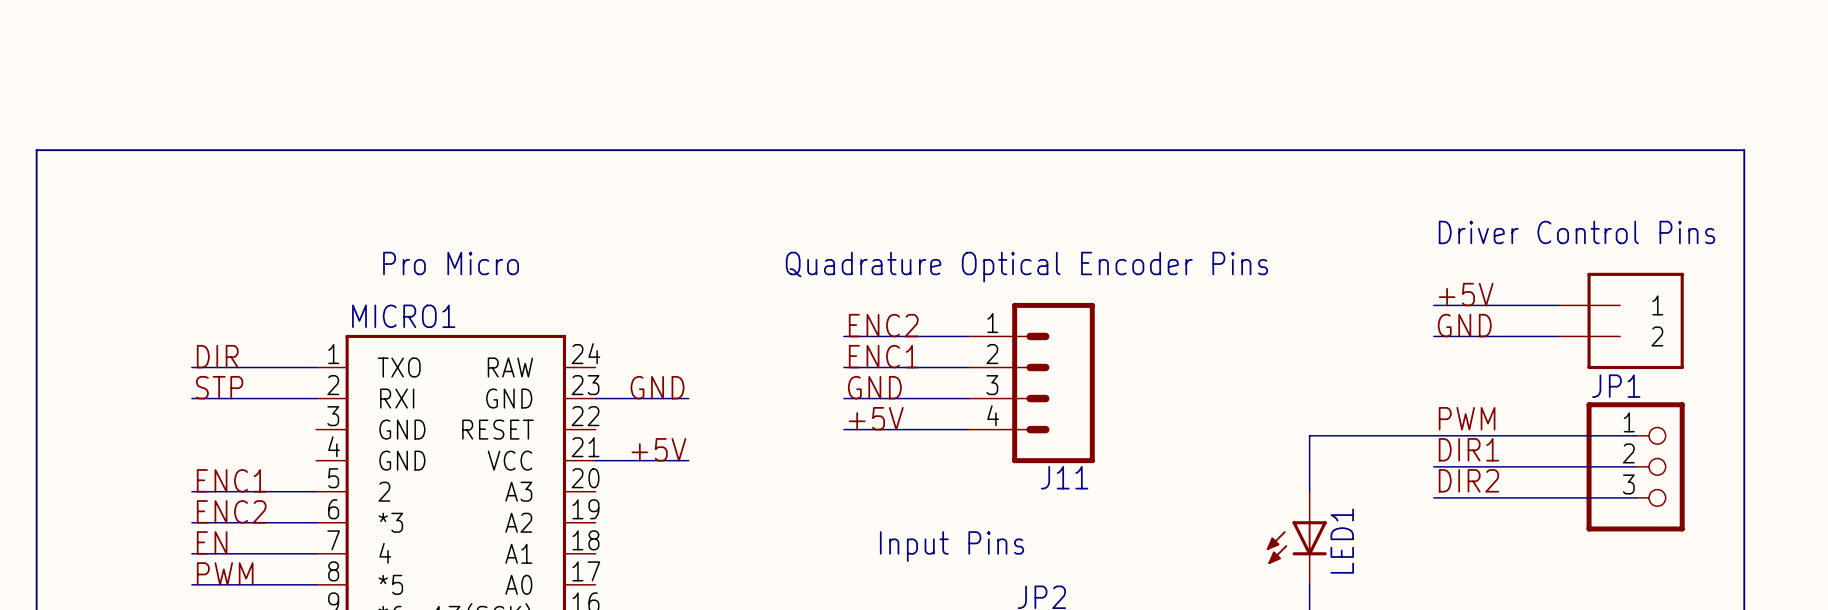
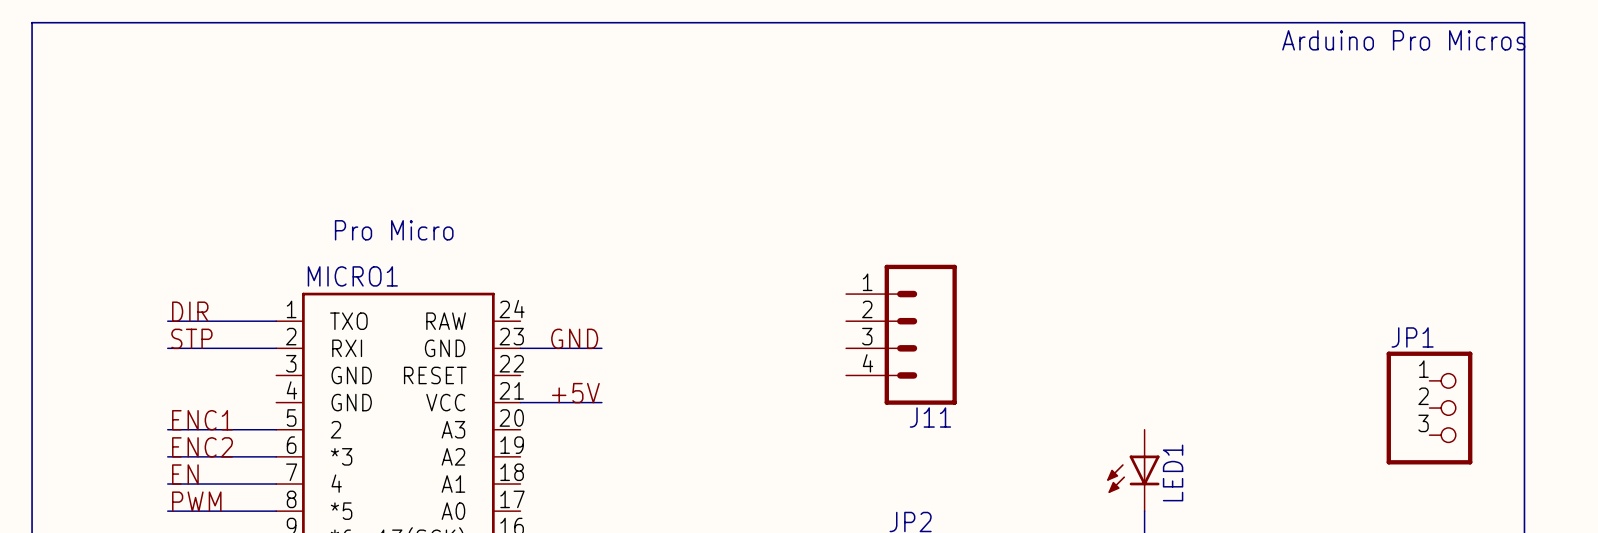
text: none -> Arduino Pro Micros (1403, 40)
line: (36, 150) (1744, 150) -> (32, 131) (32, 22) (1524, 22) (1524, 131)
text: Driver Control Pins (1577, 232) -> none
text: Quadrature Optical Encoder Pins (1026, 267) -> none
label: +5V (1466, 294) -> none
wire: (1433, 305) (1558, 305) -> none
part: (1620, 320) -> none
label: ENC2 (883, 325) -> none
label: GND (1464, 325) -> none
wire: (843, 336) (968, 336) -> none
wire: (1433, 336) (1558, 336) -> none
label: ENC1 (883, 356) -> none
wire: (843, 367) (968, 367) -> none
label: GND (874, 387) -> none
wire: (843, 398) (968, 398) -> none
label: +5V (876, 418) -> none
label: PWM (1467, 418) -> none
wire: (843, 429) (968, 429) -> none
wire: (1635, 435) (1309, 435) (1309, 491) -> none
label: DIR1 (1468, 449) -> none
wire: (1433, 466) (1635, 466) -> none
label: DIR2 (1468, 480) -> none
wire: (1433, 497) (1635, 497) -> none
text: Input Pins (952, 546) -> none

